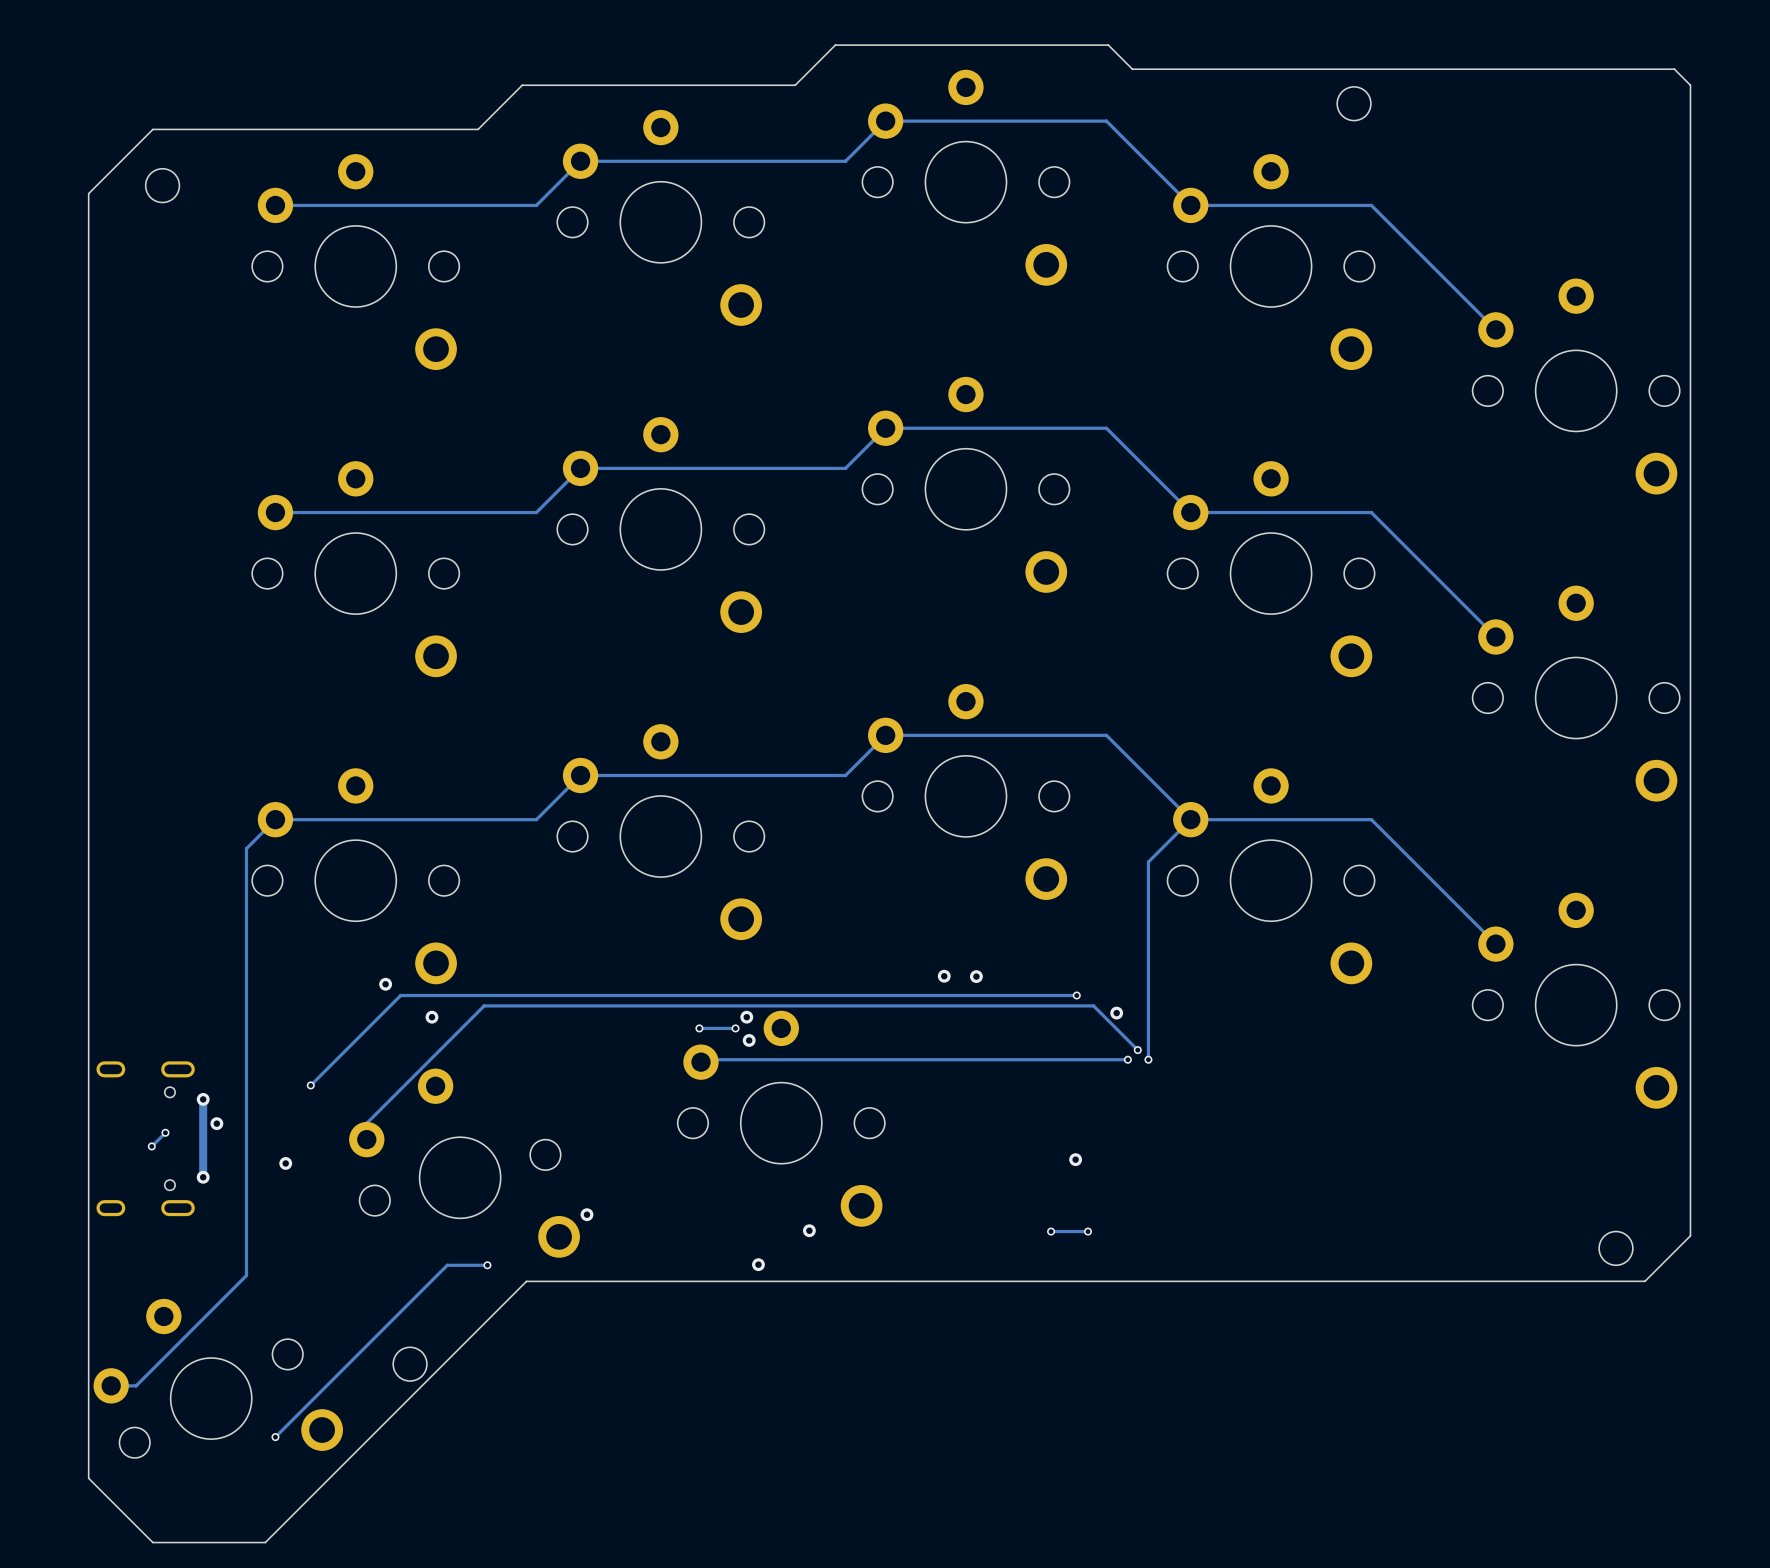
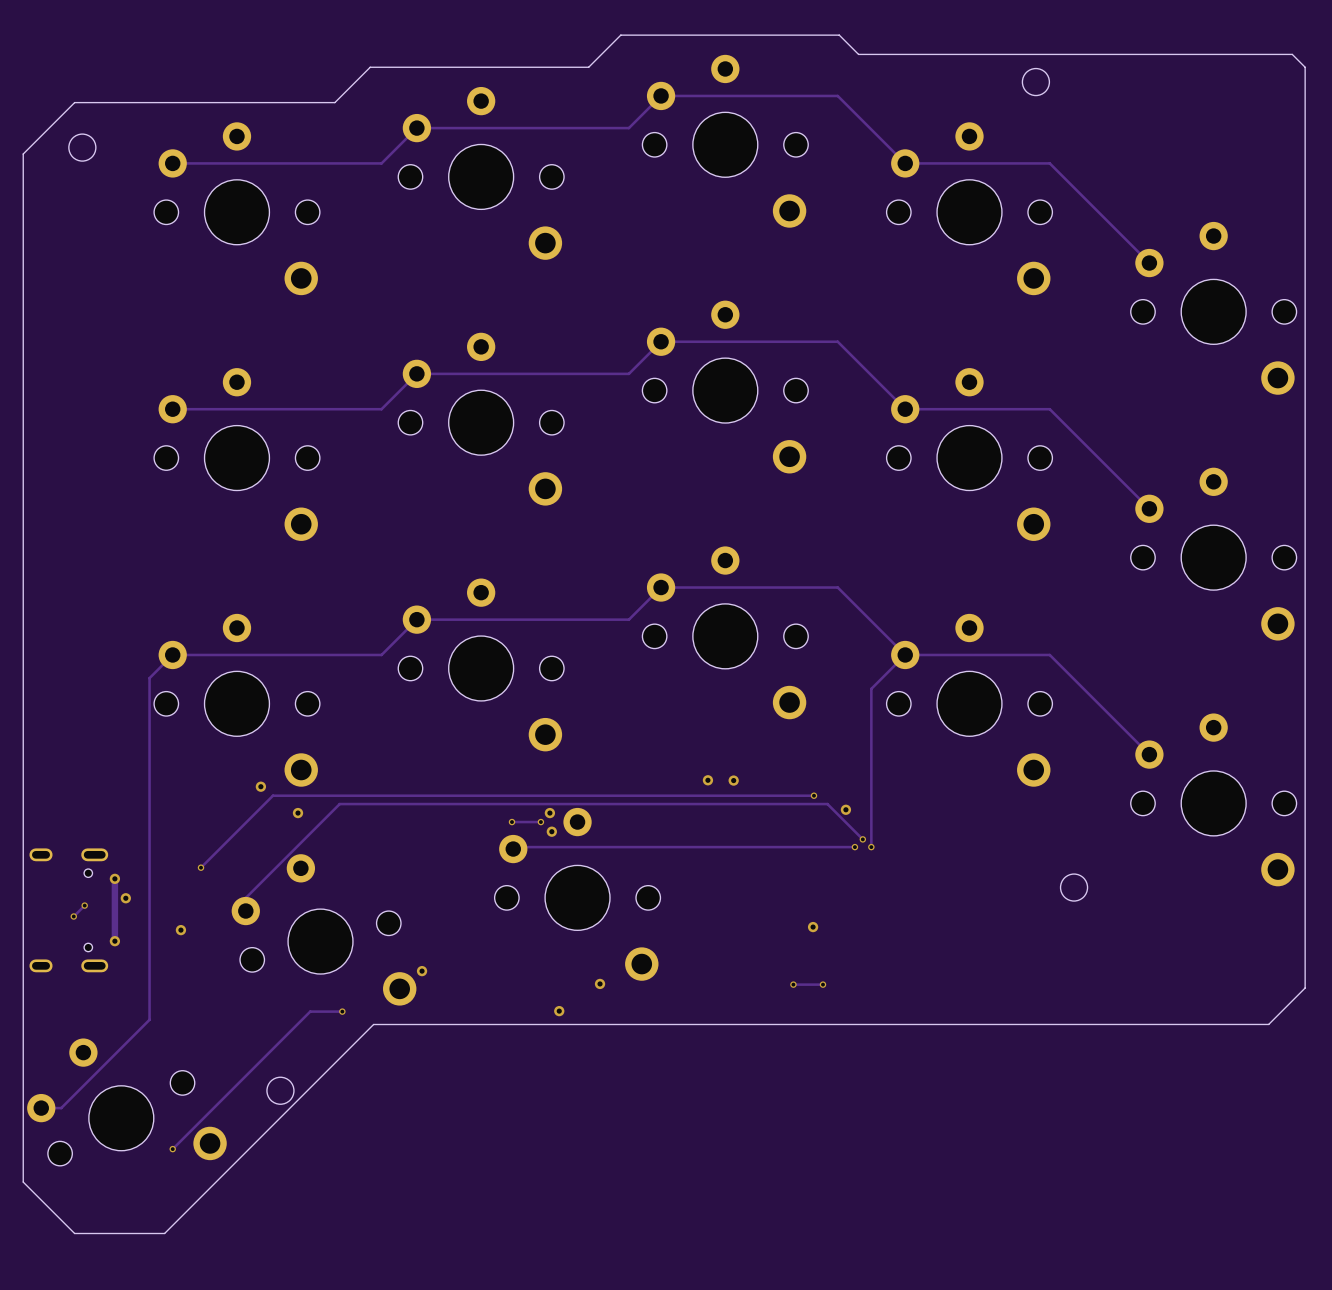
round board edge position: (1616, 1248) -> (1074, 887)

